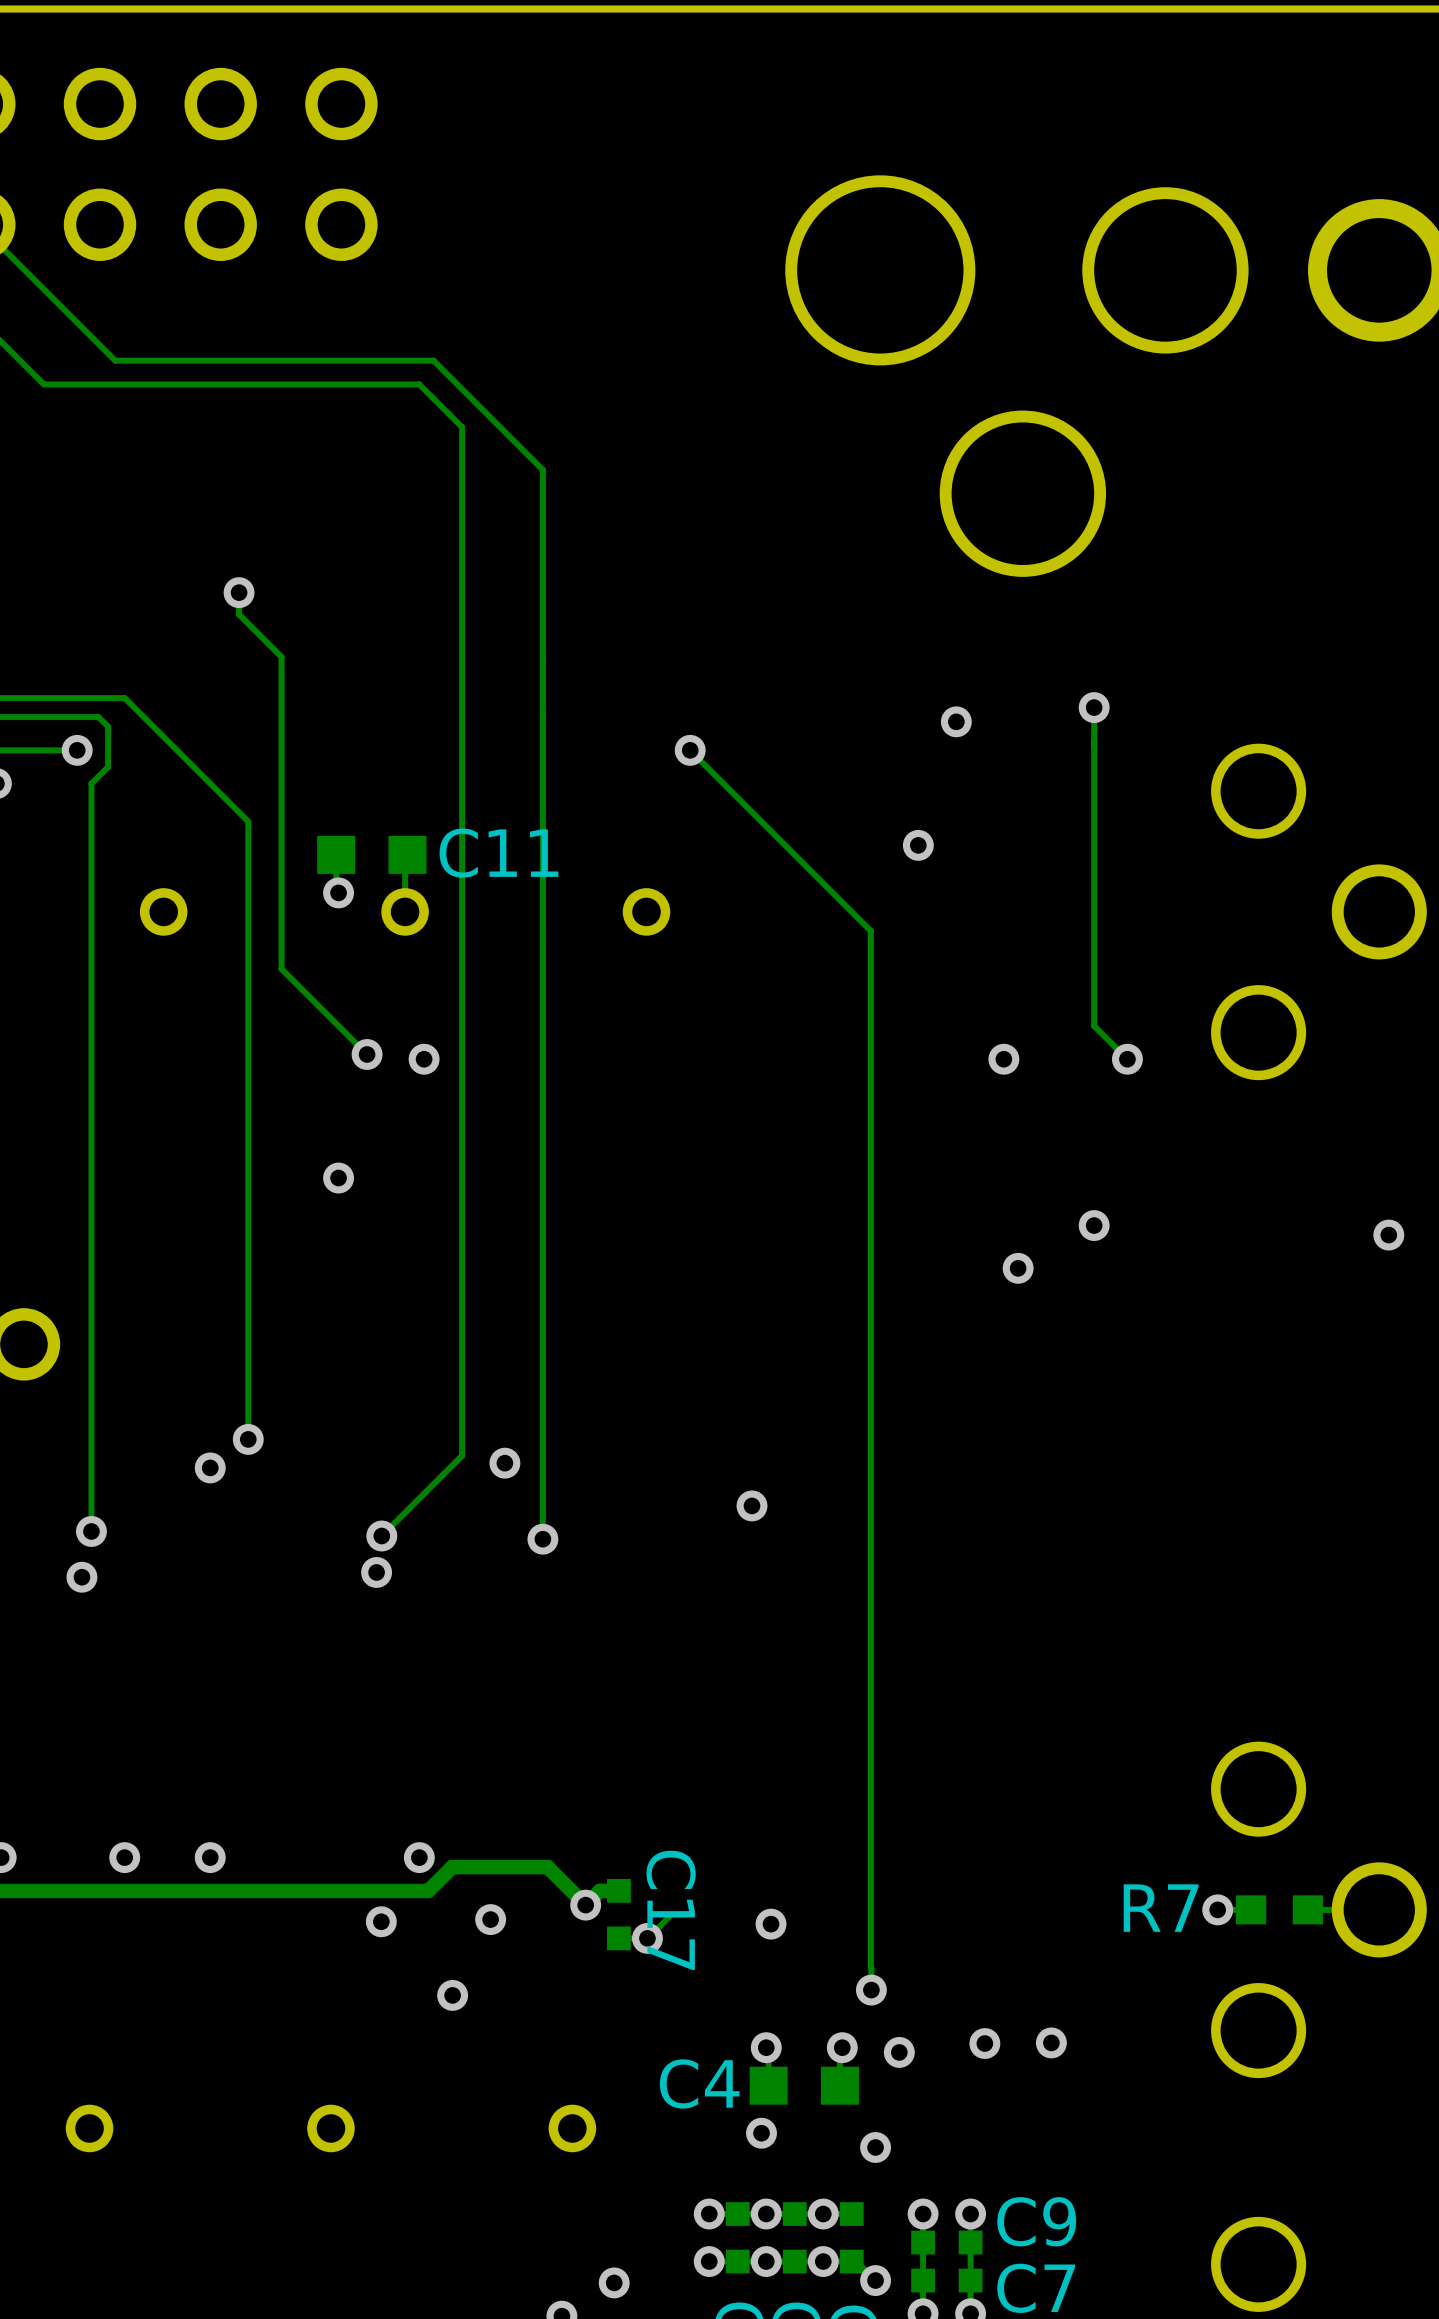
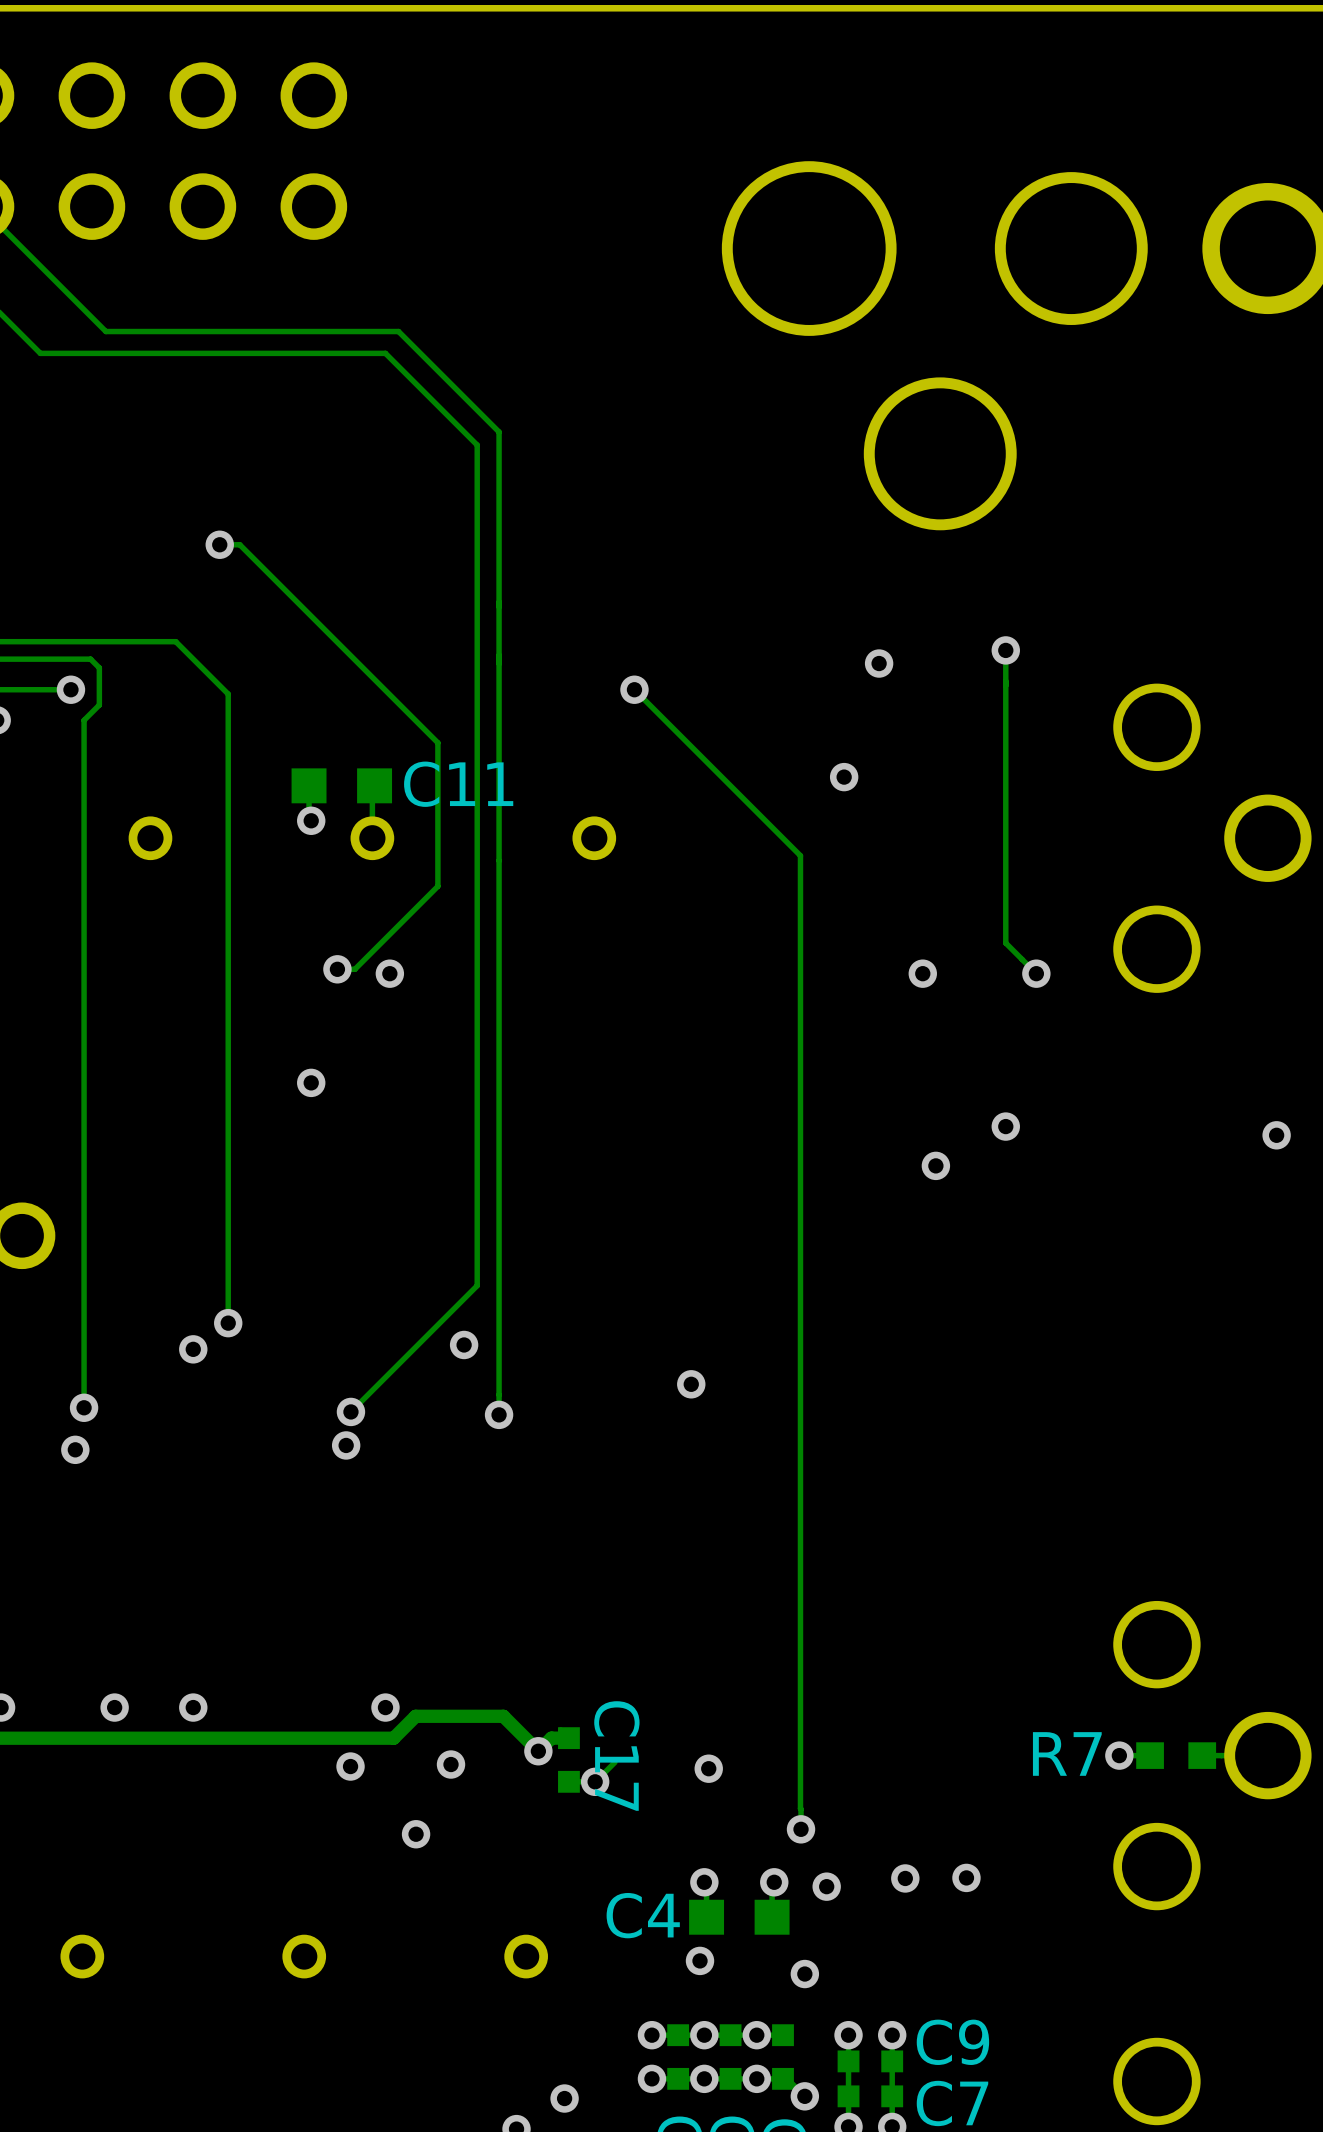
track: (462, 427) (462, 1455) -> (424, 392) (477, 445) (477, 1285) (424, 1338)
track: (239, 592) (239, 614) (281, 656) (281, 968) (367, 1054) -> (219, 544) (239, 544) (437, 742) (437, 886) (354, 969) (337, 969)
track: (124, 698) (248, 821) -> (114, 641) (175, 641) (228, 694) (228, 755)

